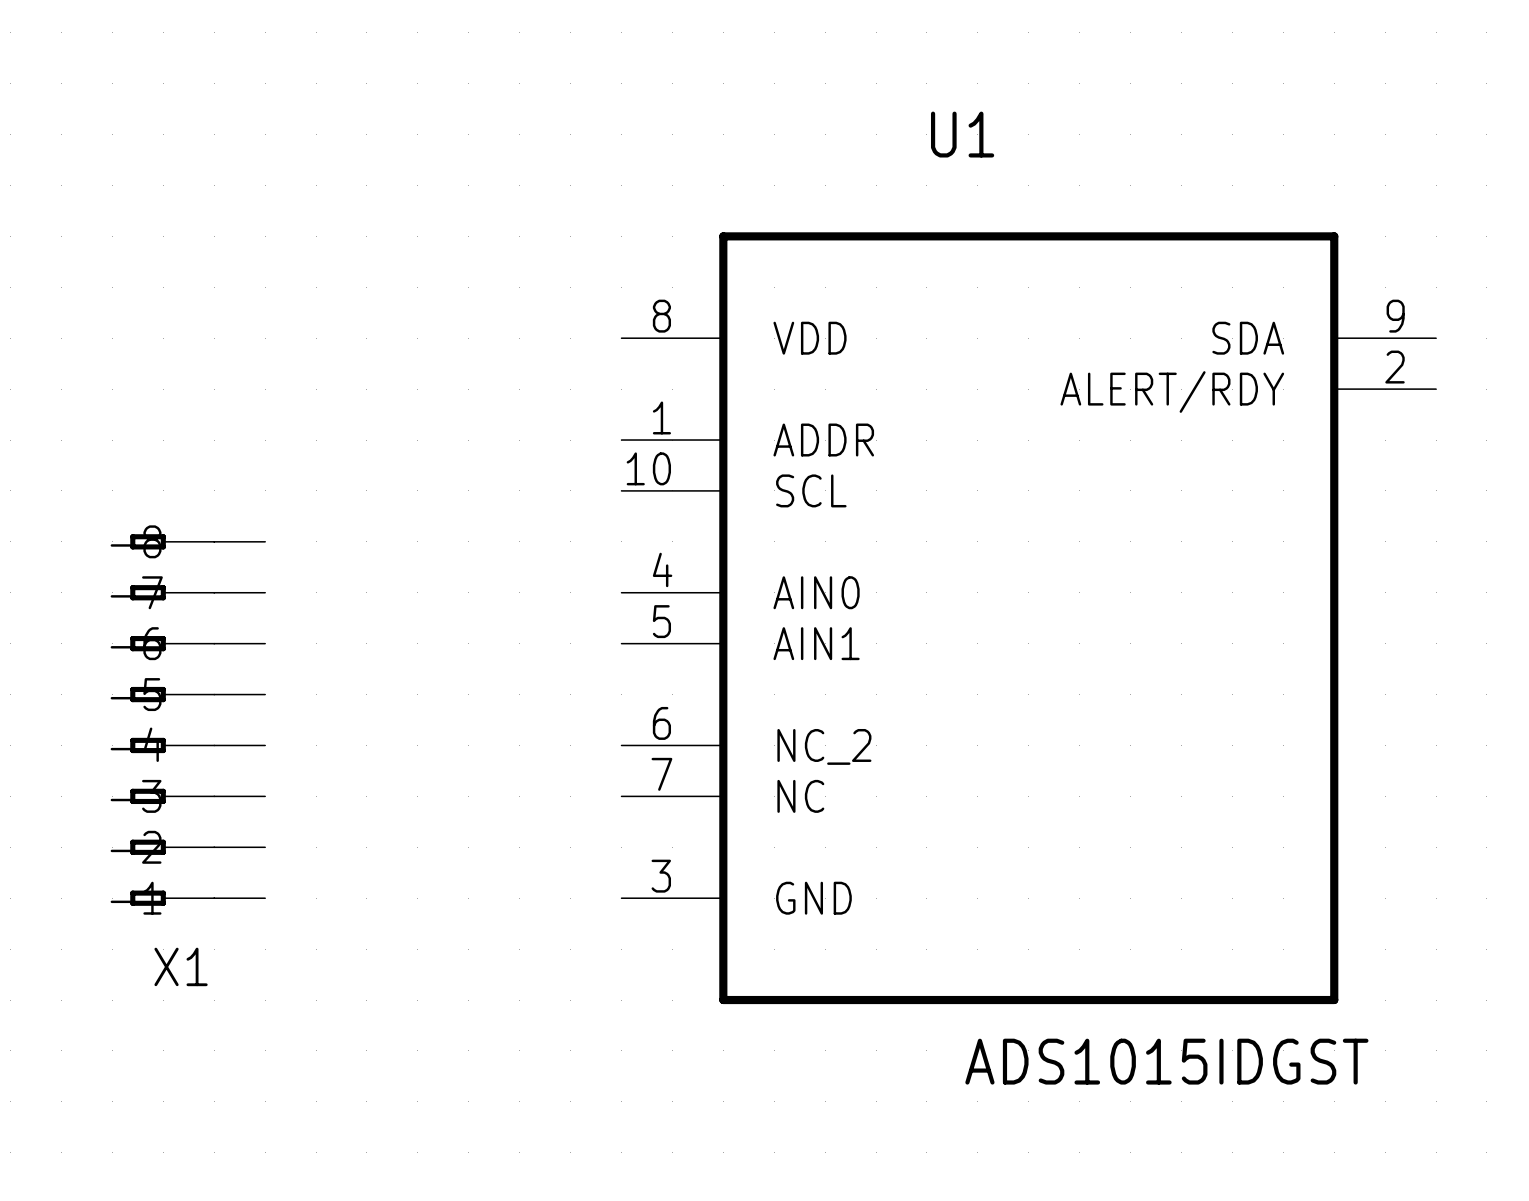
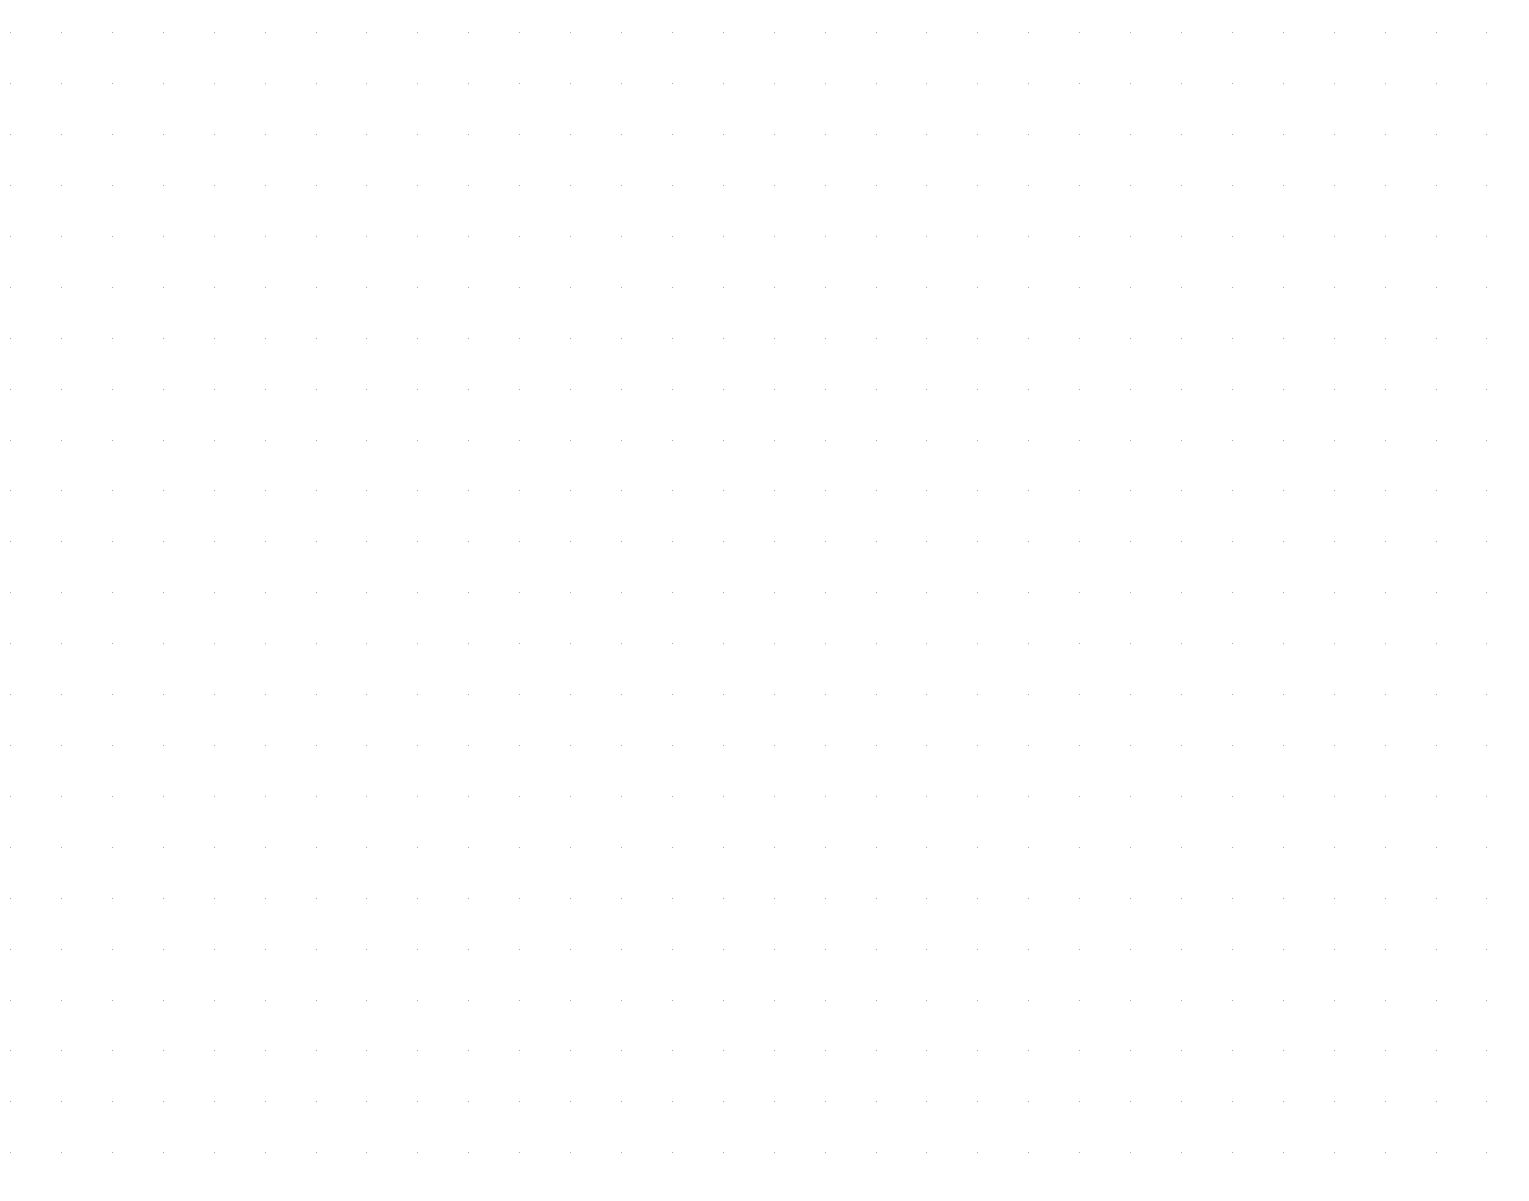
U1: ADS1015IDGST (1028, 618) -> none
X1: (197, 720) -> none

